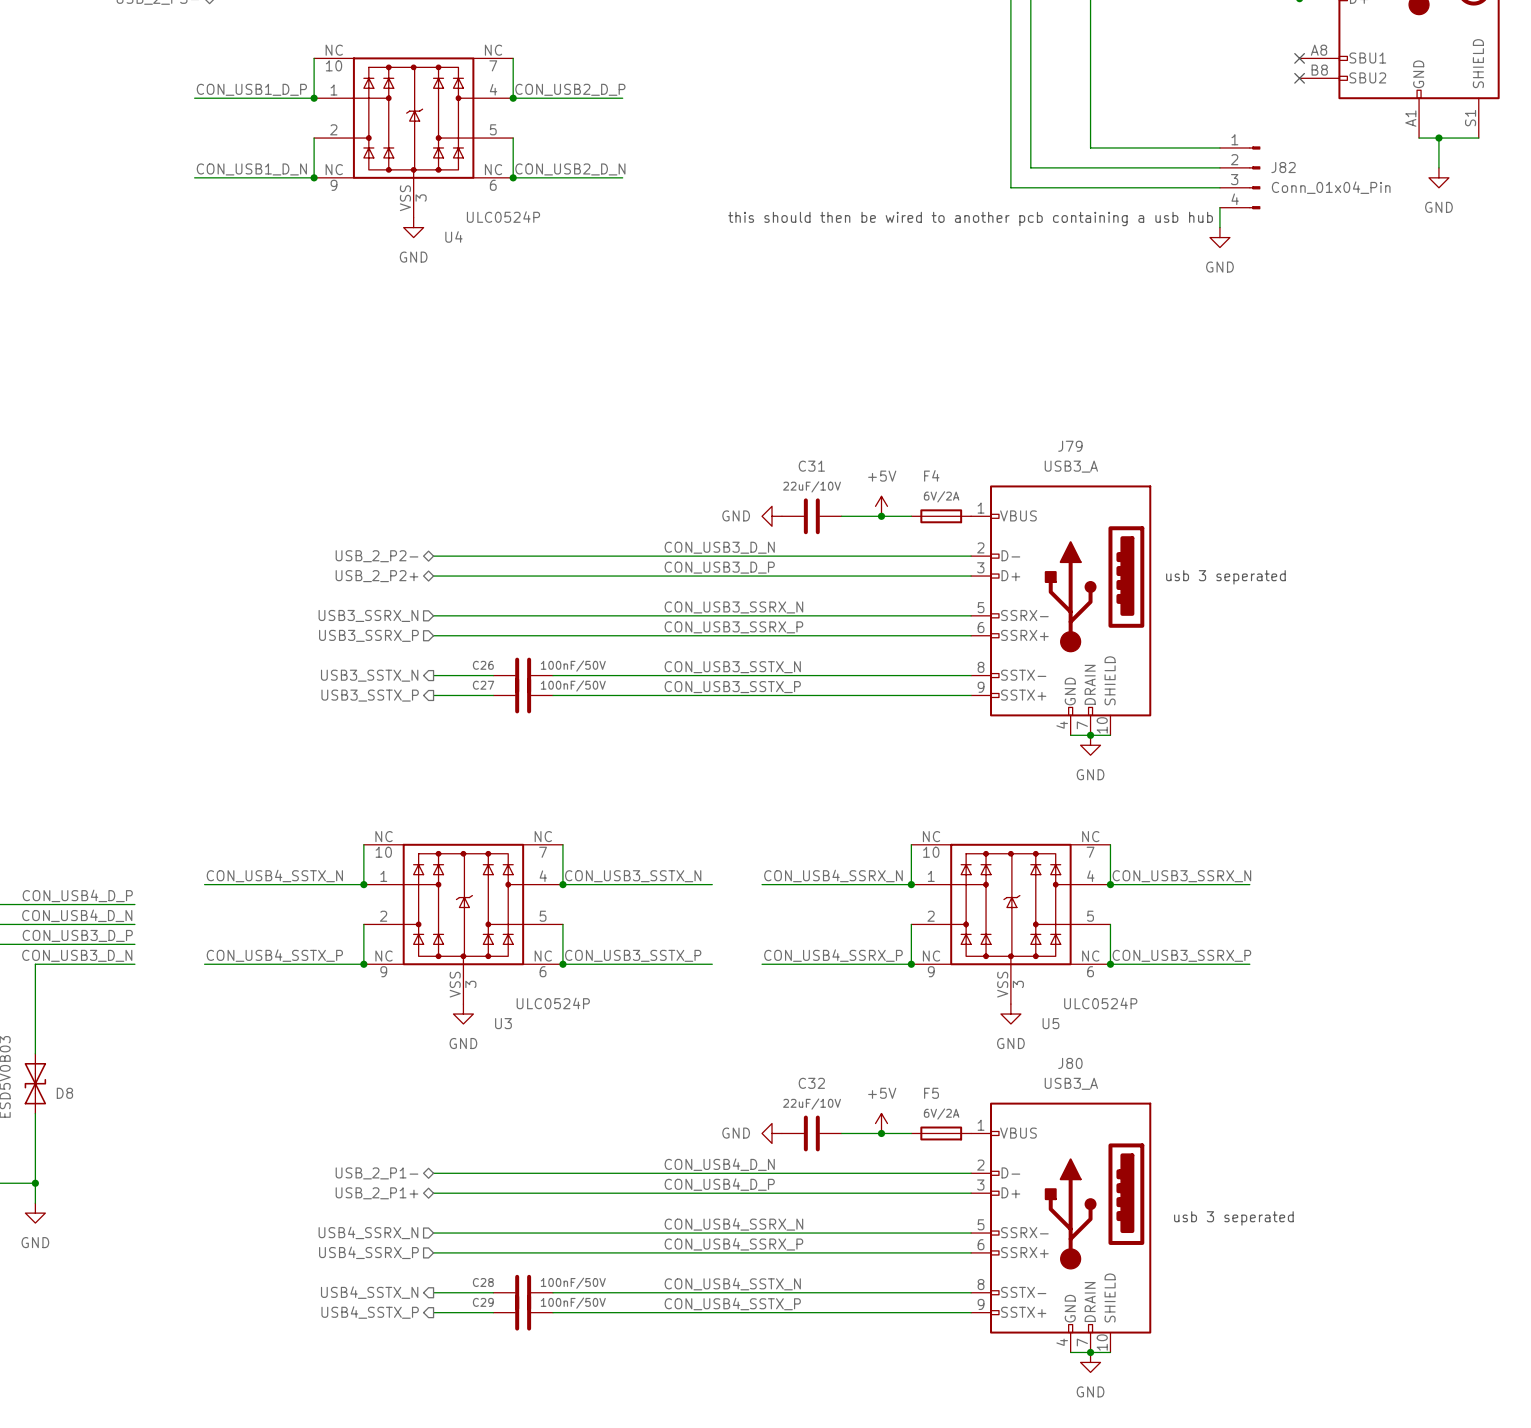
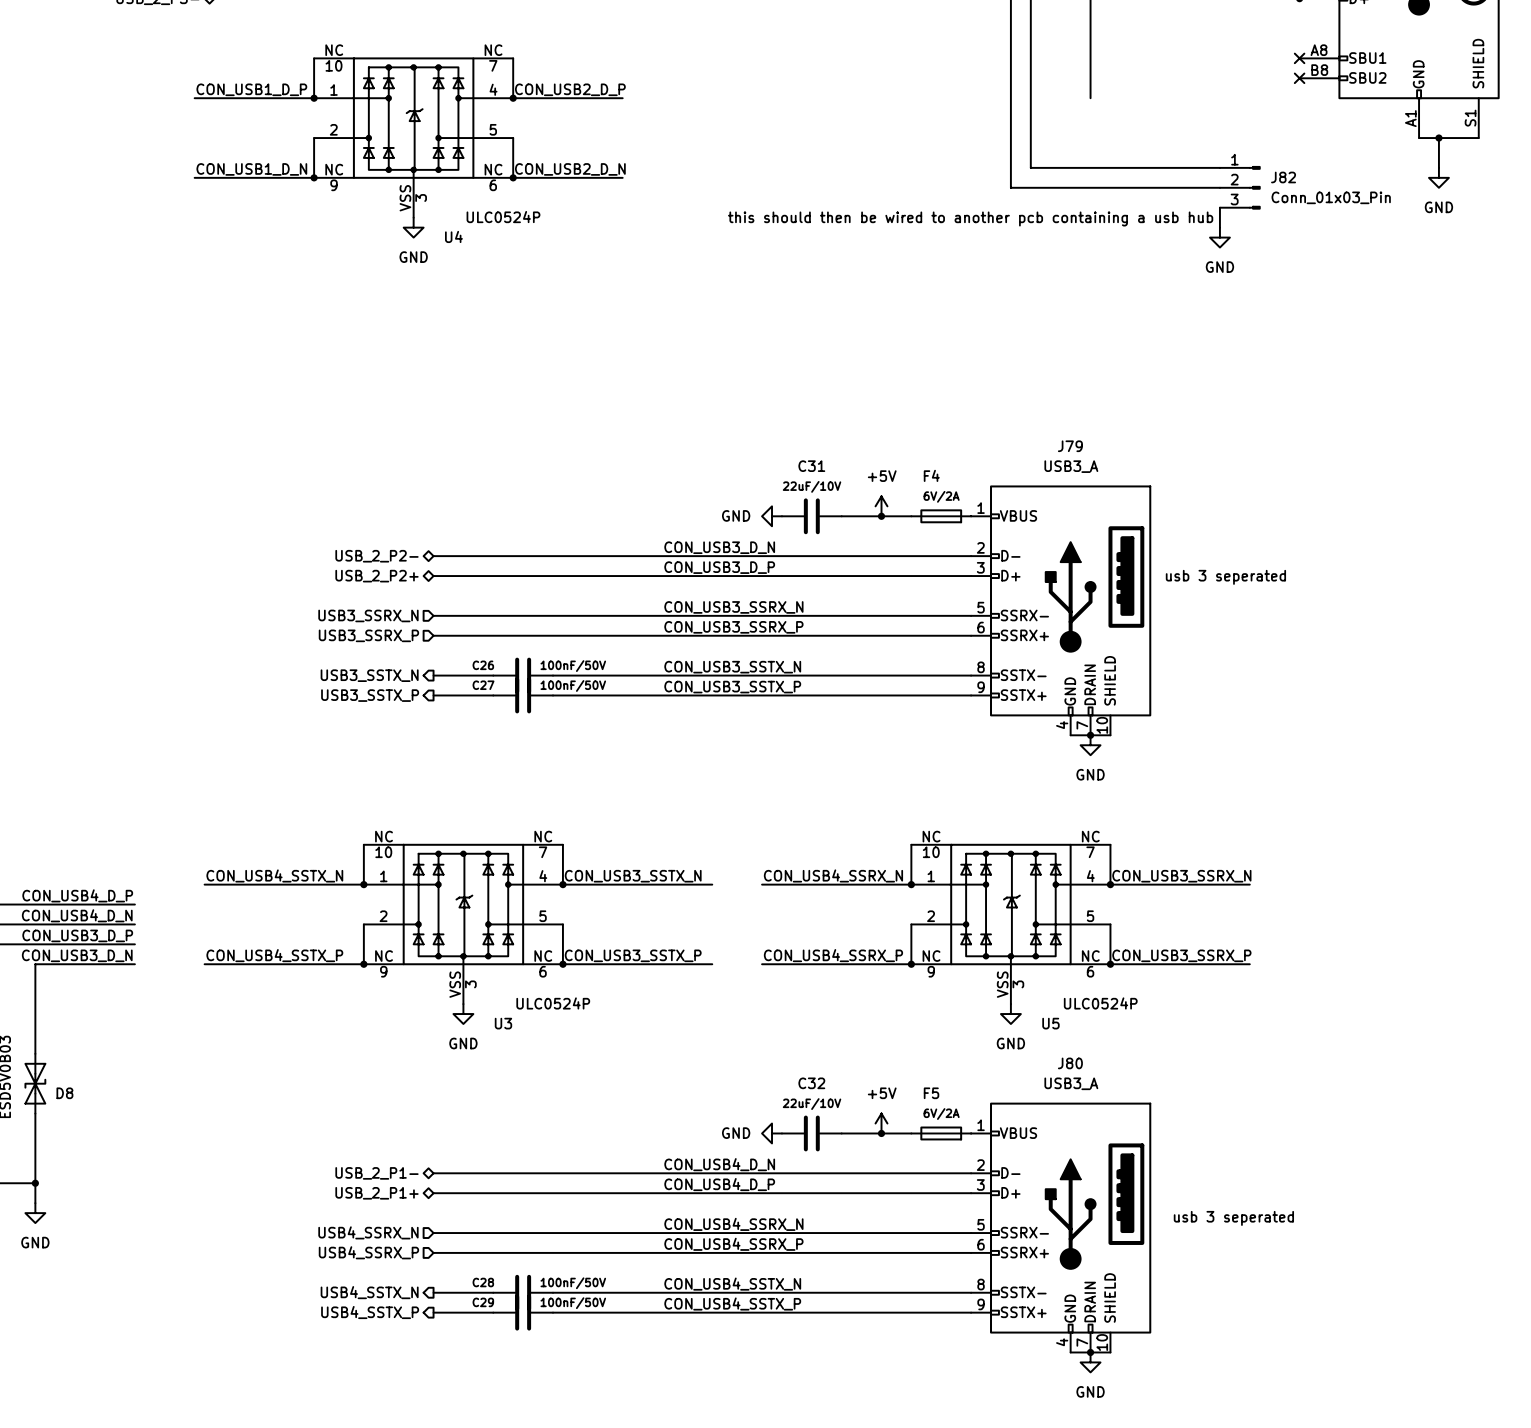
wire: (1090, 98) (1090, 147) (1219, 147) -> none
J82 symbol: [1219, 146, 1261, 210] -> [1219, 166, 1261, 210]
J82 value: Conn_01x04_Pin (1331, 187) -> Conn_01x03_Pin (1331, 197)

